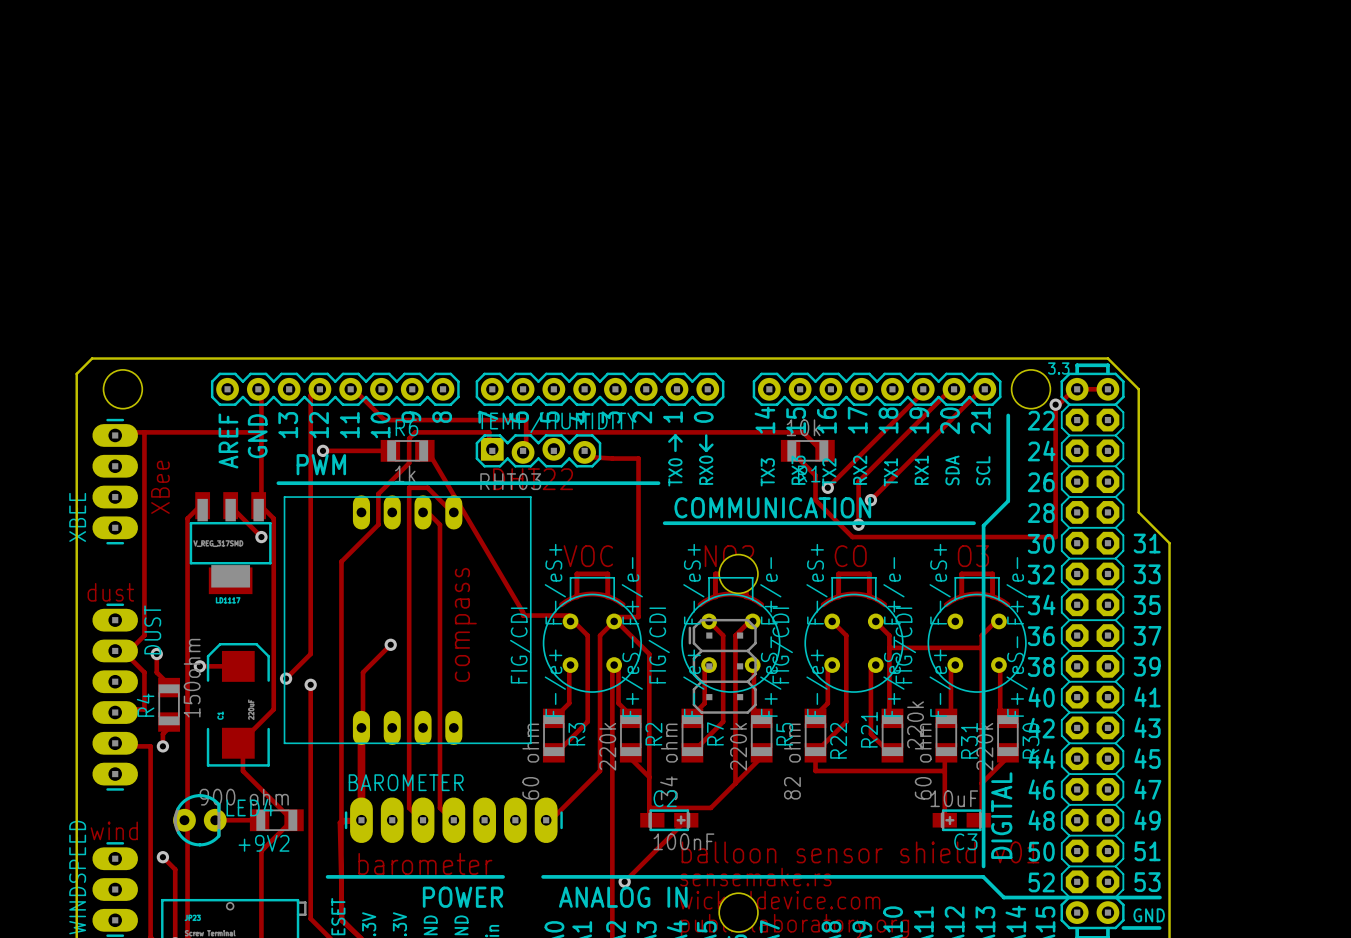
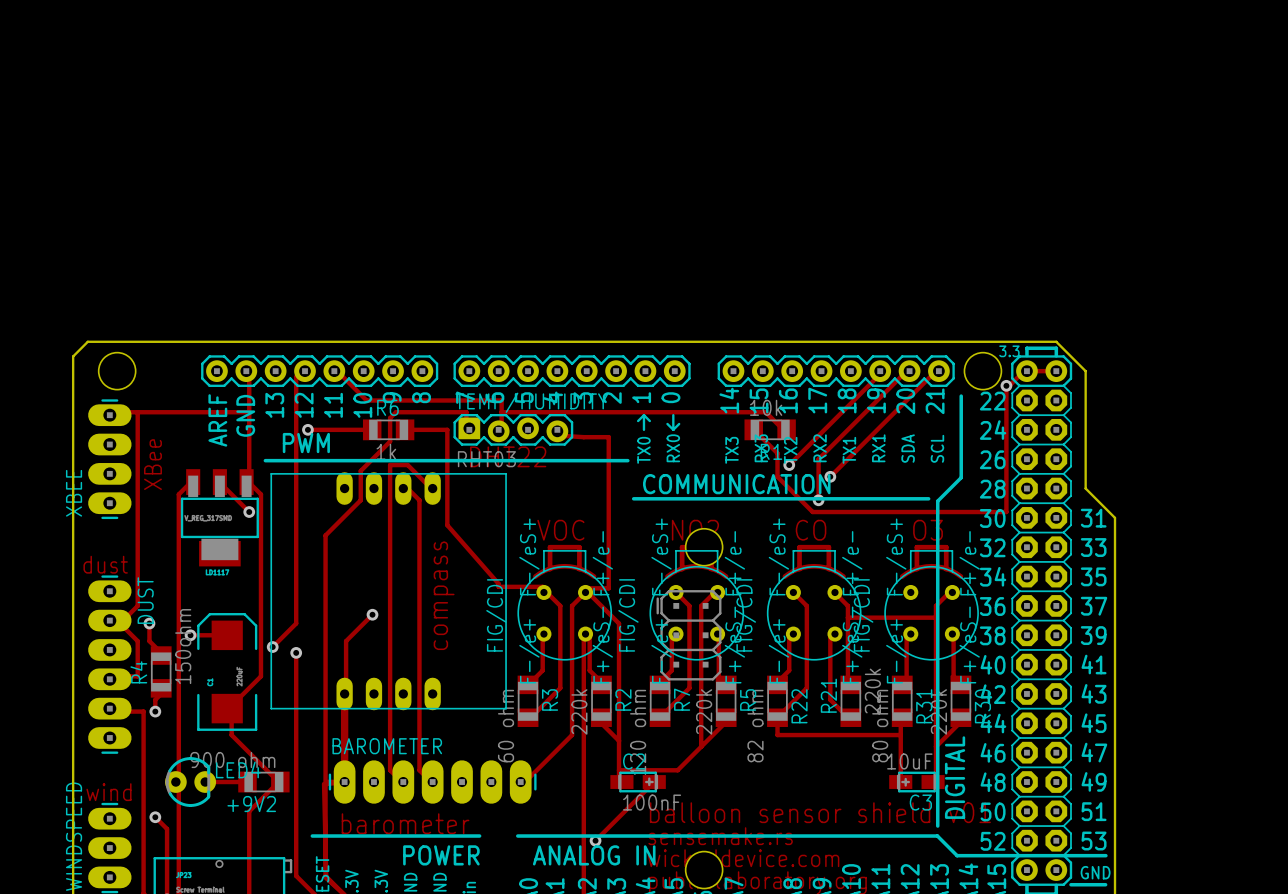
track: (427, 450) (523, 612) -> (407, 429) (447, 429) (447, 525) (498, 583)
R7 value: 34 ohm (668, 761) -> 120 ohm (638, 732)
R31 value: 60 ohm (923, 761) -> 80 ohm (880, 726)

